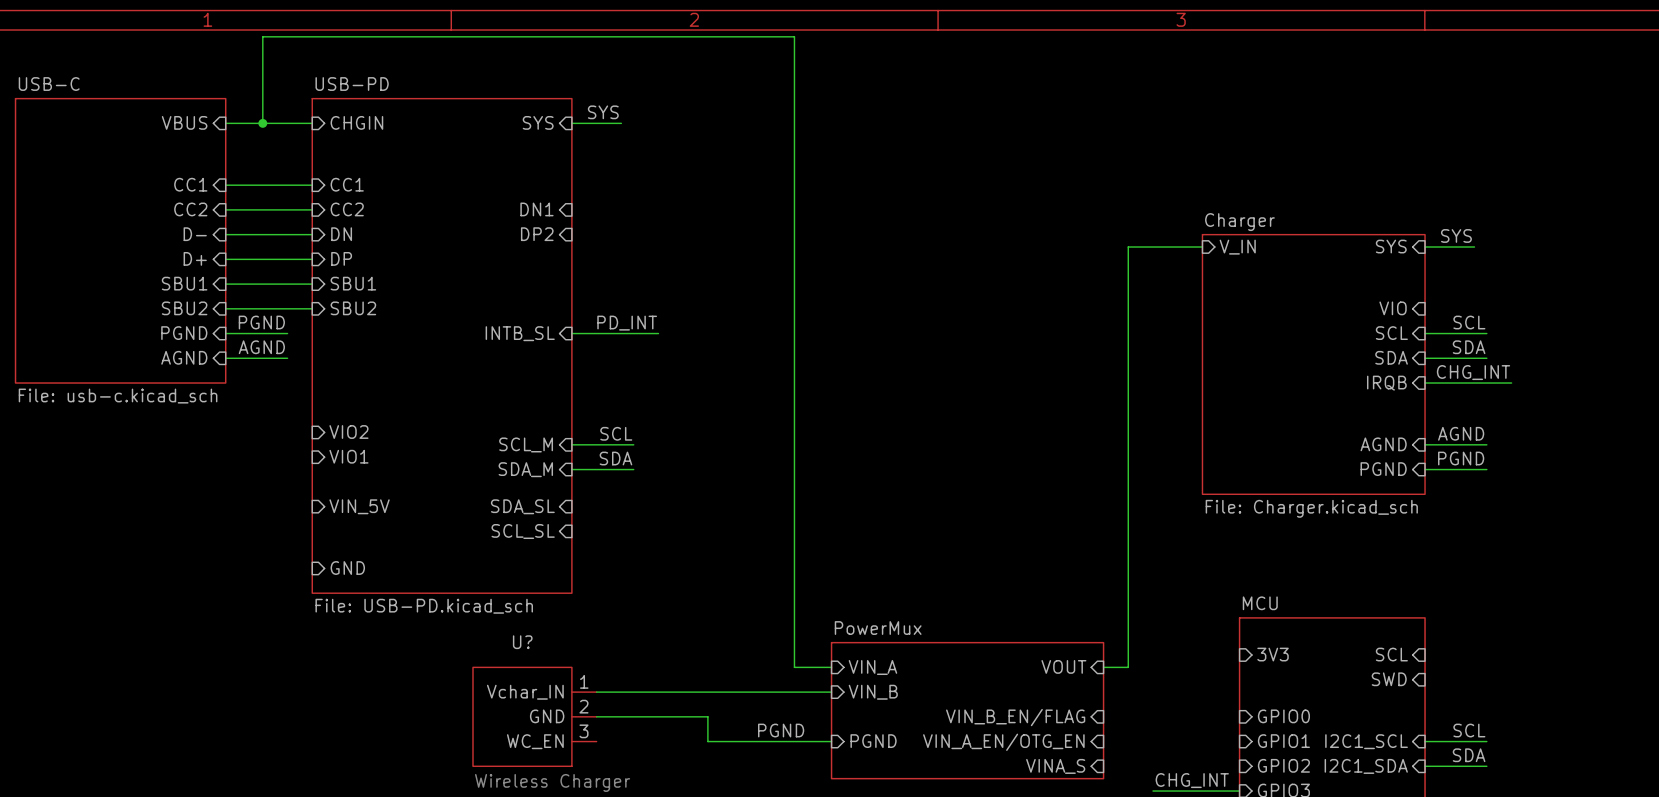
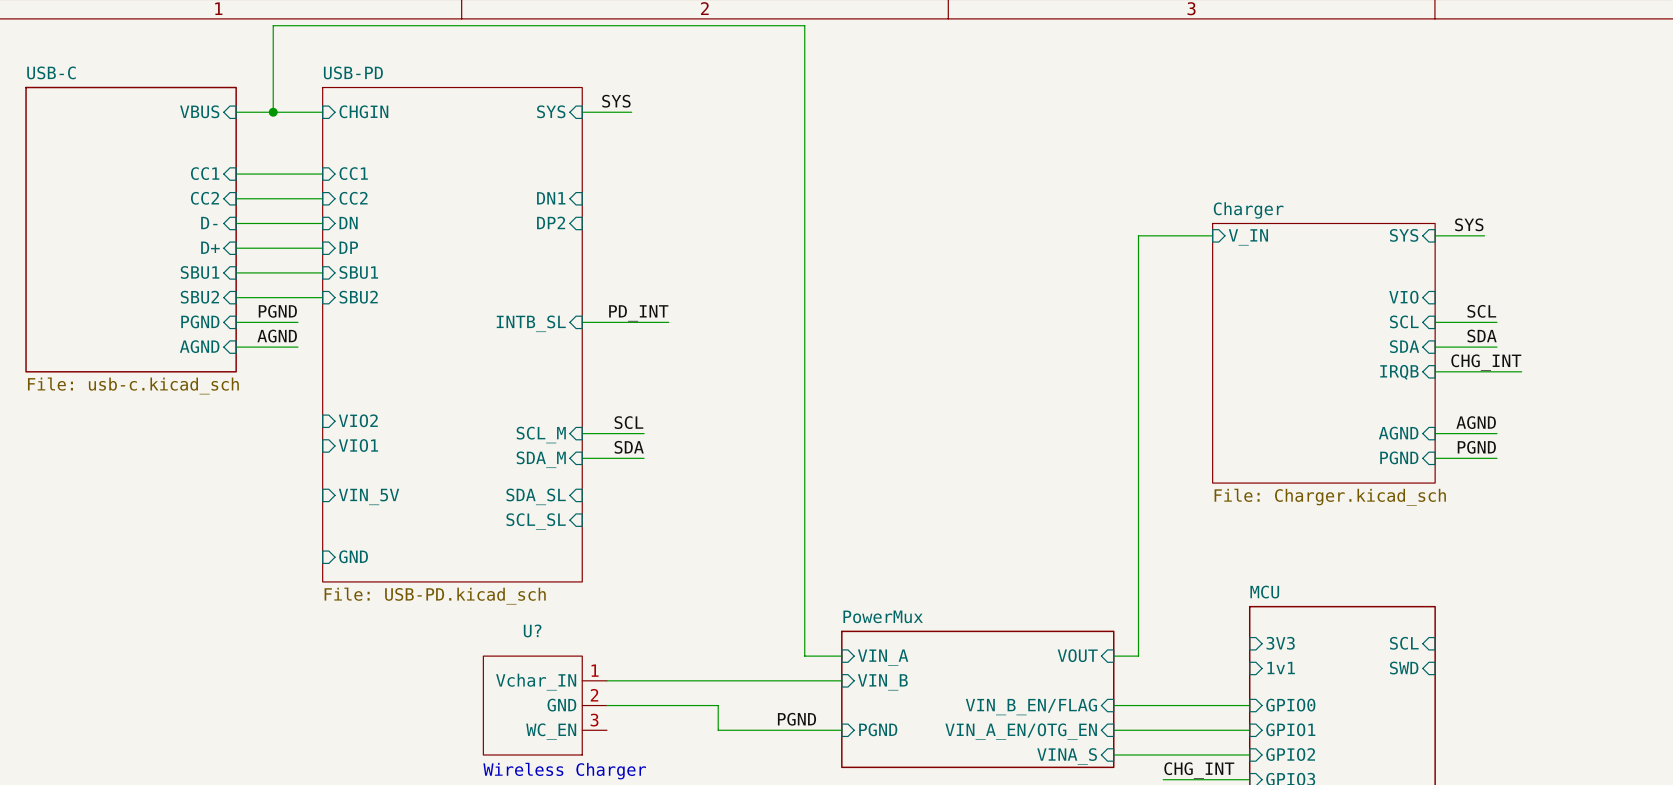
sheet pin: none -> 1v1 (1281, 668)
wire: none -> (1113, 705) (1249, 705)
label: SCL (1469, 730) -> none
wire: none -> (1113, 730) (1249, 730)
sheet pin: I2C1_SCL (1366, 741) -> none
wire: (1425, 741) (1486, 741) -> none
label: SDA (1469, 755) -> none
wire: none -> (1113, 754) (1249, 754)
sheet pin: I2C1_SDA (1366, 766) -> none
wire: (1425, 766) (1486, 766) -> none

